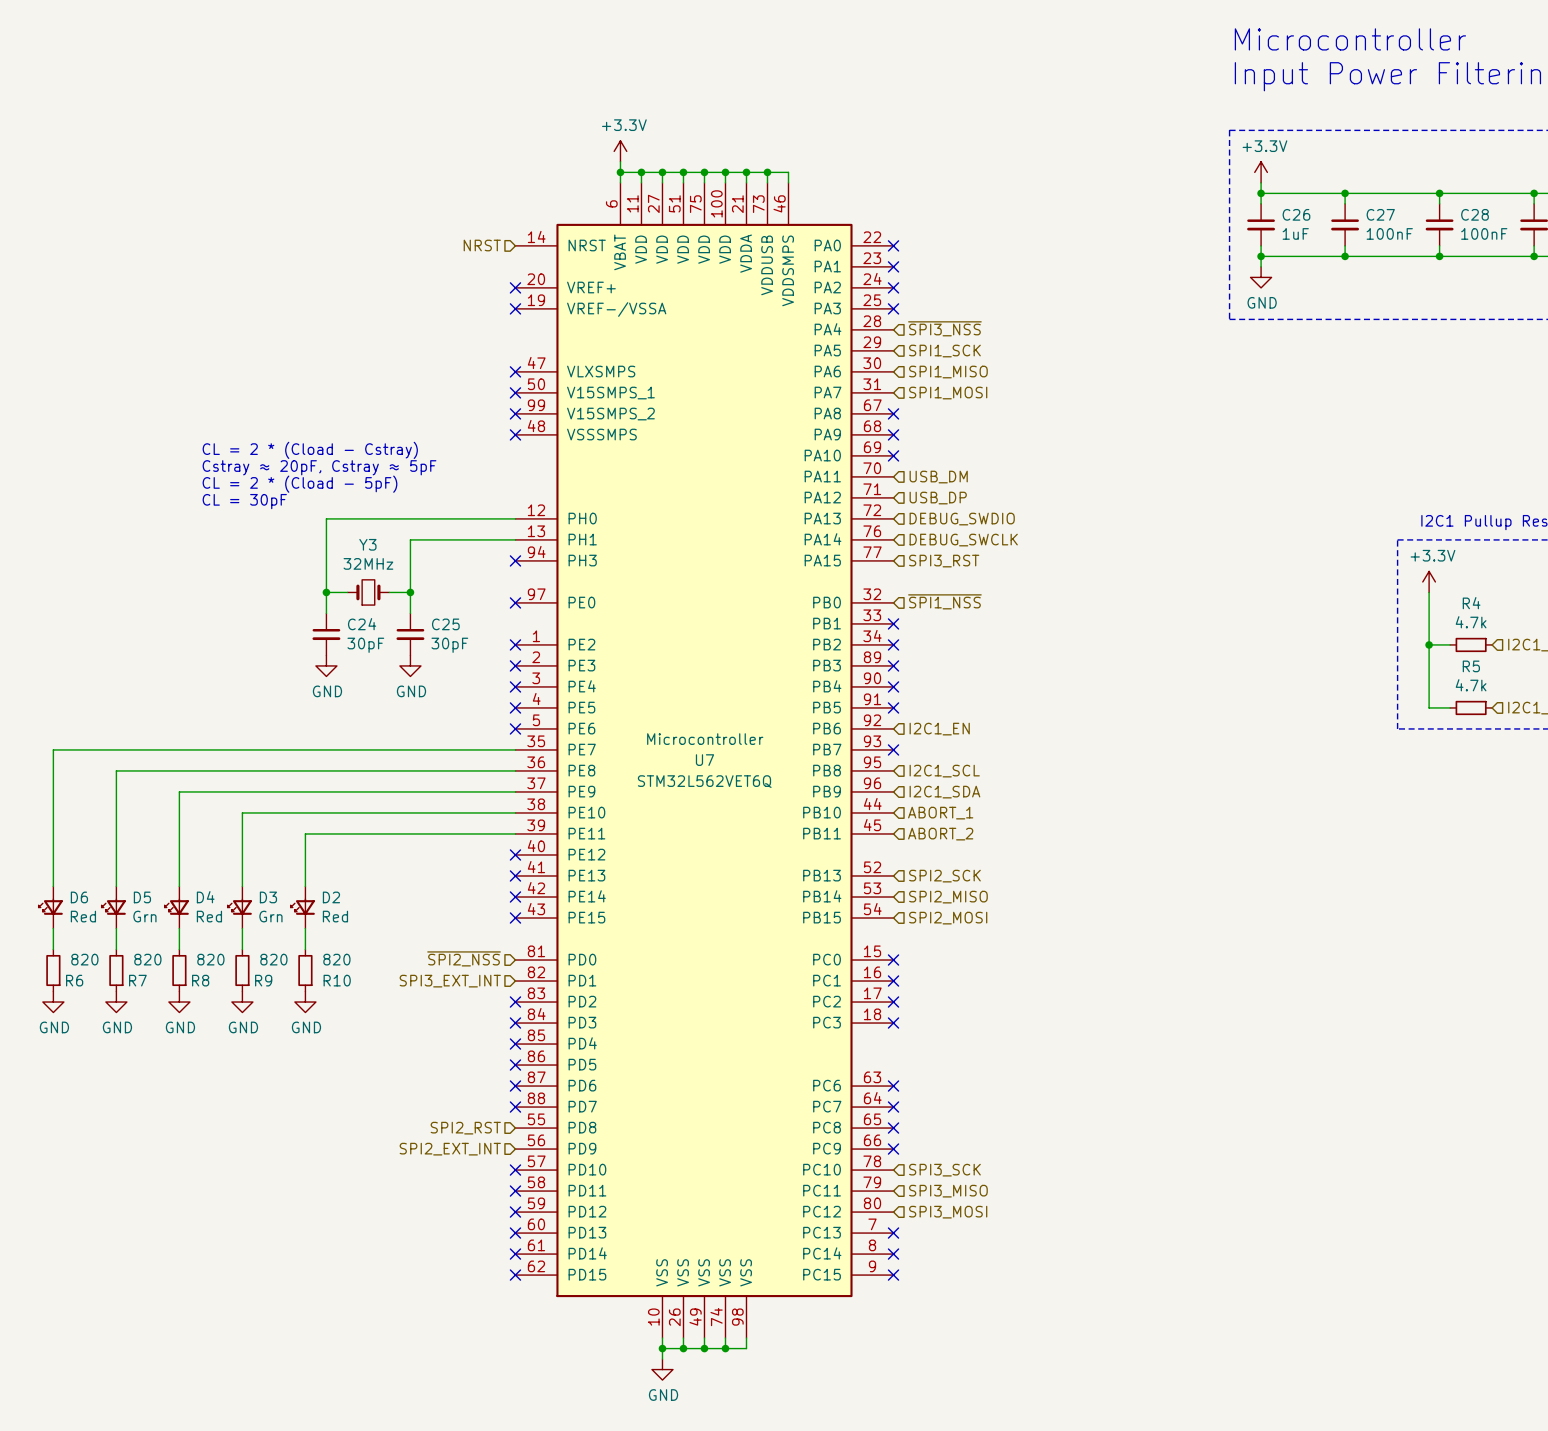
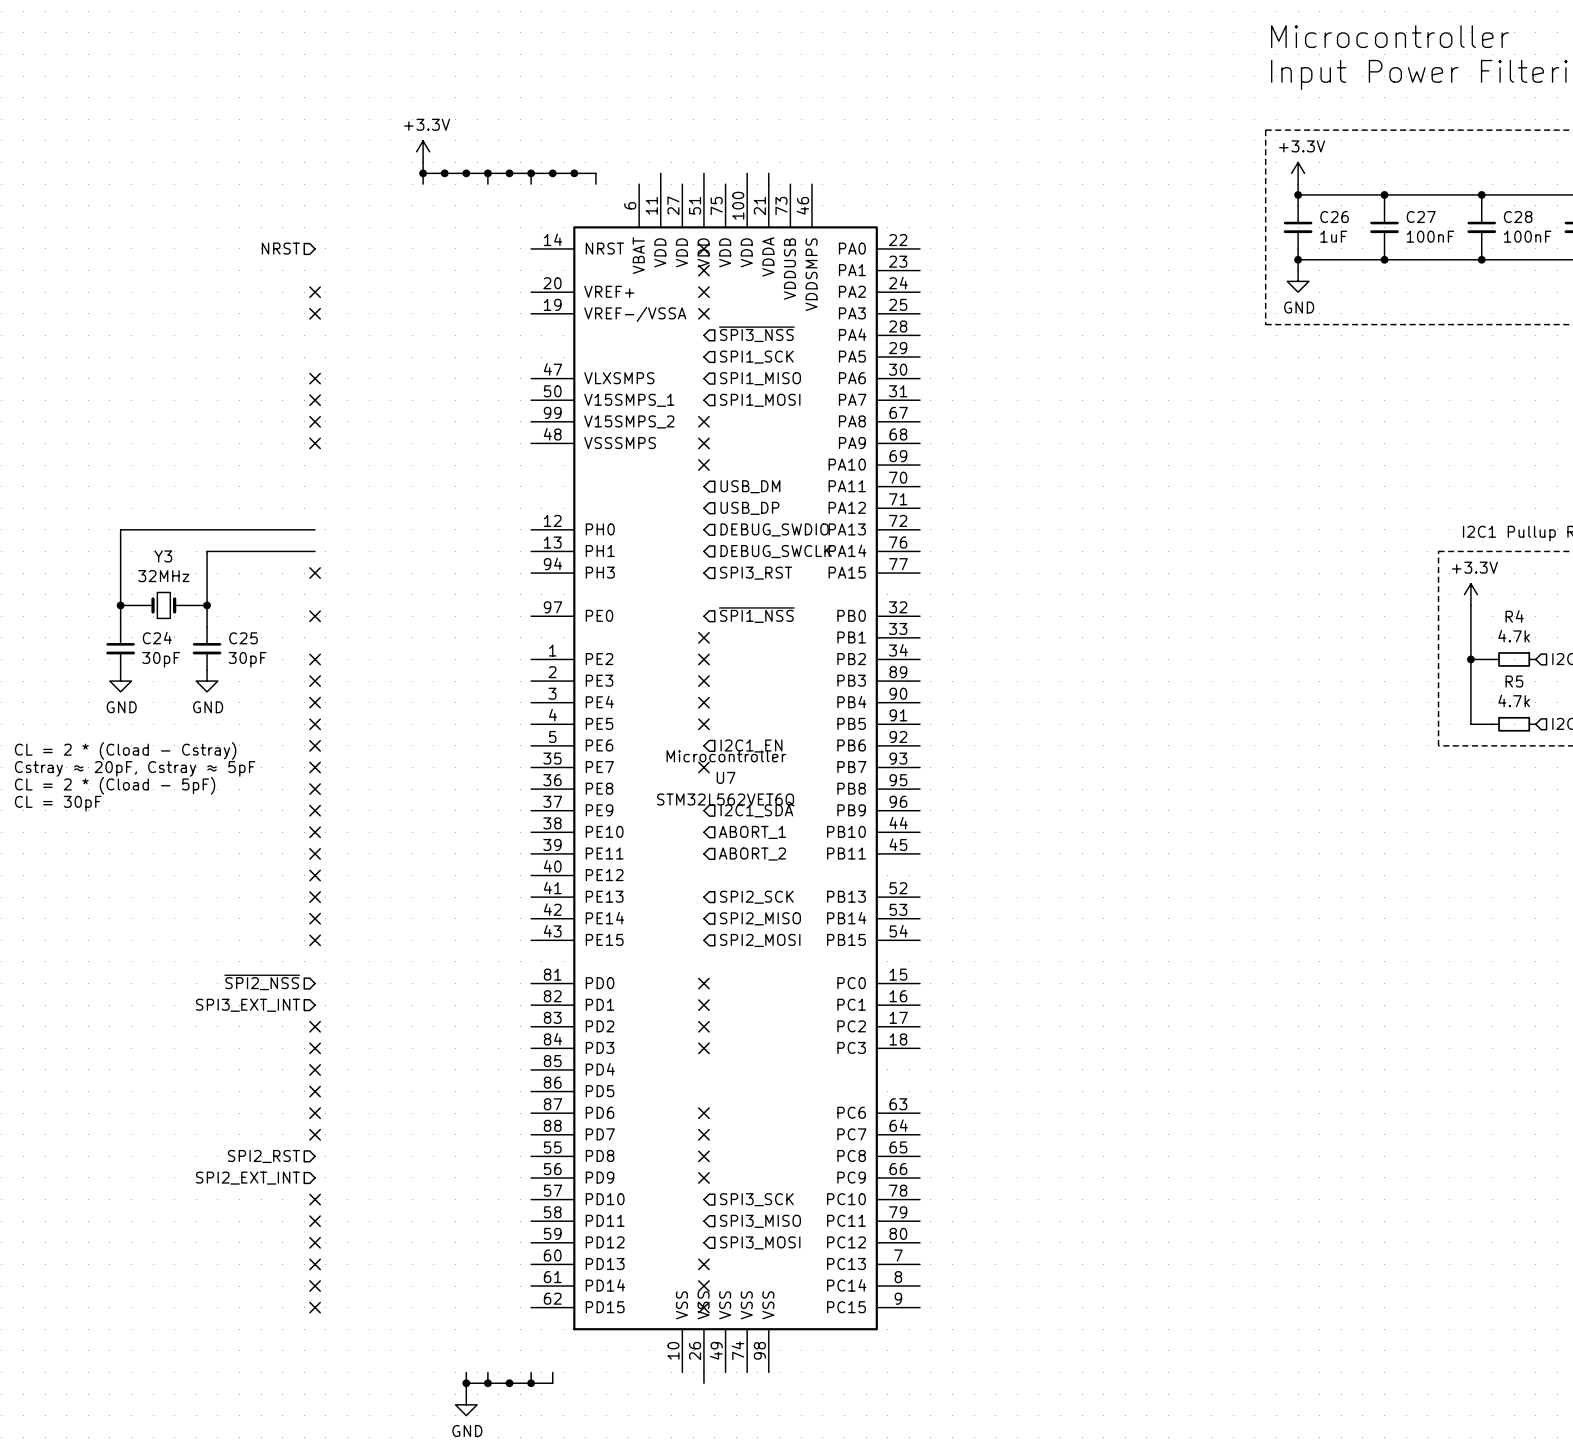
power symbol: none -> +3.3V (423, 151)
power symbol: +3.3V (620, 151) -> none
wire: none -> (423, 162) (423, 184)
wire: (620, 161) (620, 182) -> none
wire: none -> (423, 173) (595, 173) (595, 184)
junction: none -> (423, 173)
junction: none -> (444, 173)
junction: none -> (466, 173)
junction: none -> (487, 173)
junction: none -> (509, 173)
junction: none -> (531, 173)
junction: none -> (552, 173)
junction: none -> (574, 173)
wire: (620, 172) (788, 172) (788, 182) -> none
junction: (620, 172) -> none
junction: (641, 172) -> none
wire: (662, 172) (662, 182) -> (487, 173) (487, 184)
junction: (662, 172) -> none
junction: (683, 172) -> none
wire: (704, 172) (704, 182) -> (531, 173) (531, 184)
junction: (704, 172) -> none
junction: (725, 172) -> none
junction: (746, 172) -> none
wire: (767, 172) (767, 182) -> none
junction: (767, 172) -> none
hierarchical label: none -> NRST (280, 248)
hierarchical label: NRST (482, 245) -> none
no-connect mark: none -> (703, 248)
no-connect mark: (893, 245) -> none
no-connect mark: none -> (703, 270)
no-connect mark: (893, 266) -> none
no-connect mark: none -> (315, 292)
no-connect mark: (515, 287) -> none
no-connect mark: none -> (703, 292)
no-connect mark: (893, 287) -> none
no-connect mark: none -> (315, 313)
no-connect mark: (515, 308) -> none
no-connect mark: none -> (703, 313)
no-connect mark: (893, 308) -> none
hierarchical label: none -> ~{SPI3_NSS} (756, 334)
hierarchical label: ~{SPI3_NSS} (944, 328) -> none
hierarchical label: none -> SPI1_SCK (756, 357)
hierarchical label: SPI1_SCK (944, 351) -> none
no-connect mark: none -> (315, 378)
no-connect mark: (515, 371) -> none
hierarchical label: none -> SPI1_MISO (760, 378)
hierarchical label: SPI1_MISO (948, 372) -> none
no-connect mark: none -> (315, 400)
no-connect mark: (515, 392) -> none
hierarchical label: none -> SPI1_MOSI (760, 400)
hierarchical label: SPI1_MOSI (948, 393) -> none
no-connect mark: none -> (315, 421)
no-connect mark: (515, 413) -> none
no-connect mark: none -> (703, 421)
no-connect mark: (893, 413) -> none
no-connect mark: none -> (315, 443)
no-connect mark: (515, 434) -> none
no-connect mark: none -> (703, 443)
no-connect mark: (893, 434) -> none
text: CL = 2 * (Cload - Cstray) (310, 450) -> none
no-connect mark: none -> (703, 465)
no-connect mark: (893, 455) -> none
text: Cstray ≈ 20pF, Cstray ≈ 5pF (319, 467) -> none
hierarchical label: none -> USB_DM (750, 486)
hierarchical label: USB_DM (938, 477) -> none
text: CL = 2 * (Cload - 5pF) (299, 484) -> none
hierarchical label: none -> USB_DP (749, 508)
hierarchical label: USB_DP (938, 498) -> none
text: CL = 30pF (244, 501) -> none
wire: none -> (315, 529) (120, 529) (120, 627)
wire: (515, 518) (326, 518) (326, 613) -> none
hierarchical label: none -> DEBUG_SWDIO (774, 529)
hierarchical label: DEBUG_SWDIO (962, 519) -> none
wire: none -> (315, 551) (207, 551) (207, 627)
wire: (515, 539) (410, 539) (410, 613) -> none
hierarchical label: none -> DEBUG_SWCLK (776, 551)
hierarchical label: DEBUG_SWCLK (963, 540) -> none
no-connect mark: none -> (315, 573)
no-connect mark: (515, 560) -> none
hierarchical label: none -> SPI3_RST (756, 573)
hierarchical label: SPI3_RST (944, 561) -> none
wire: none -> (120, 605) (142, 605)
junction: none -> (120, 605)
junction: none -> (207, 605)
wire: (326, 592) (347, 592) -> (185, 605) (207, 605)
junction: (326, 592) -> none
Y3 position: (368, 592) -> (163, 605)
wire: (389, 592) (410, 592) -> none
junction: (410, 592) -> none
hierarchical label: none -> ~{SPI1_NSS} (756, 615)
hierarchical label: ~{SPI1_NSS} (944, 601) -> none
no-connect mark: none -> (315, 616)
no-connect mark: (515, 602) -> none
no-connect mark: none -> (703, 637)
no-connect mark: (893, 623) -> none
C24 position: (326, 634) -> (120, 648)
C25 position: (410, 634) -> (207, 648)
no-connect mark: none -> (315, 659)
no-connect mark: (515, 644) -> none
no-connect mark: none -> (703, 659)
no-connect mark: (893, 644) -> none
power symbol: none -> GND (120, 681)
power symbol: none -> GND (207, 681)
no-connect mark: none -> (315, 681)
power symbol: GND (326, 665) -> none
power symbol: GND (410, 665) -> none
no-connect mark: (515, 665) -> none
no-connect mark: none -> (703, 681)
no-connect mark: (893, 665) -> none
no-connect mark: none -> (315, 702)
no-connect mark: (515, 686) -> none
no-connect mark: none -> (703, 702)
no-connect mark: (893, 686) -> none
no-connect mark: none -> (315, 724)
no-connect mark: (515, 707) -> none
no-connect mark: none -> (703, 724)
no-connect mark: (893, 707) -> none
no-connect mark: none -> (315, 745)
no-connect mark: (515, 728) -> none
hierarchical label: none -> I2C1_EN (751, 745)
hierarchical label: I2C1_EN (939, 729) -> none
text: none -> CL = 2 * (Cload - Cstray) (125, 750)
no-connect mark: none -> (315, 767)
wire: (515, 749) (53, 749) (53, 886) -> none
no-connect mark: none -> (703, 767)
no-connect mark: (893, 749) -> none
text: none -> Cstray ≈ 20pF, Cstray ≈ 5pF (135, 768)
text: none -> CL = 2 * (Cload - 5pF) (115, 785)
no-connect mark: none -> (315, 789)
wire: (515, 770) (116, 770) (116, 886) -> none
hierarchical label: I2C1_SCL (944, 771) -> none
text: none -> CL = 30pF (58, 803)
no-connect mark: none -> (315, 810)
wire: (515, 791) (179, 791) (179, 886) -> none
hierarchical label: none -> I2C1_SDA (756, 810)
hierarchical label: I2C1_SDA (944, 792) -> none
no-connect mark: none -> (315, 832)
wire: (515, 812) (242, 812) (242, 886) -> none
hierarchical label: none -> ABORT_1 (752, 832)
hierarchical label: ABORT_1 (940, 813) -> none
no-connect mark: none -> (315, 853)
wire: (515, 833) (305, 833) (305, 886) -> none
hierarchical label: none -> ABORT_2 (752, 854)
hierarchical label: ABORT_2 (940, 834) -> none
no-connect mark: none -> (315, 875)
no-connect mark: (515, 854) -> none
no-connect mark: none -> (315, 897)
no-connect mark: (515, 875) -> none
hierarchical label: none -> SPI2_SCK (756, 897)
hierarchical label: SPI2_SCK (944, 876) -> none
no-connect mark: none -> (315, 918)
no-connect mark: (515, 897) -> none
hierarchical label: none -> SPI2_MISO (760, 918)
hierarchical label: SPI2_MISO (948, 897) -> none
D6: Red (50, 907) -> none
D5: Grn (113, 907) -> none
D4: Red (176, 907) -> none
D3: Grn (239, 907) -> none
D2: Red (302, 907) -> none
no-connect mark: none -> (315, 940)
no-connect mark: (515, 918) -> none
hierarchical label: none -> SPI2_MOSI (760, 940)
hierarchical label: SPI2_MOSI (948, 918) -> none
wire: (53, 928) (53, 949) -> none
wire: (116, 928) (116, 949) -> none
wire: (179, 928) (179, 949) -> none
wire: (242, 928) (242, 949) -> none
wire: (305, 928) (305, 949) -> none
hierarchical label: none -> ~{SPI2_NSS} (262, 982)
hierarchical label: ~{SPI2_NSS} (464, 958) -> none
no-connect mark: none -> (703, 983)
no-connect mark: (893, 960) -> none
R6: 820 (53, 970) -> none
R7: 820 (116, 970) -> none
R8: 820 (179, 970) -> none
R9: 820 (242, 970) -> none
R10: 820 (305, 970) -> none
hierarchical label: none -> SPI3_EXT_INT (248, 1005)
hierarchical label: SPI3_EXT_INT (450, 981) -> none
no-connect mark: none -> (703, 1005)
no-connect mark: (893, 981) -> none
power symbol: GND (53, 1002) -> none
power symbol: GND (116, 1002) -> none
power symbol: GND (179, 1002) -> none
power symbol: GND (242, 1002) -> none
power symbol: GND (305, 1002) -> none
no-connect mark: none -> (315, 1026)
no-connect mark: (515, 1002) -> none
no-connect mark: none -> (703, 1026)
no-connect mark: (893, 1002) -> none
no-connect mark: none -> (315, 1048)
no-connect mark: (515, 1023) -> none
no-connect mark: none -> (703, 1048)
no-connect mark: (893, 1023) -> none
no-connect mark: none -> (315, 1069)
no-connect mark: (515, 1044) -> none
no-connect mark: none -> (315, 1091)
no-connect mark: (515, 1065) -> none
no-connect mark: none -> (315, 1113)
no-connect mark: (515, 1086) -> none
no-connect mark: none -> (703, 1113)
no-connect mark: (893, 1086) -> none
no-connect mark: none -> (315, 1134)
no-connect mark: (515, 1107) -> none
no-connect mark: none -> (703, 1134)
no-connect mark: (893, 1107) -> none
hierarchical label: none -> SPI2_RST (263, 1156)
hierarchical label: SPI2_RST (465, 1128) -> none
no-connect mark: none -> (703, 1156)
no-connect mark: (893, 1128) -> none
hierarchical label: none -> SPI2_EXT_INT (248, 1178)
hierarchical label: SPI2_EXT_INT (450, 1149) -> none
no-connect mark: none -> (703, 1177)
no-connect mark: (893, 1149) -> none
no-connect mark: none -> (315, 1199)
no-connect mark: (515, 1170) -> none
hierarchical label: none -> SPI3_SCK (756, 1199)
hierarchical label: SPI3_SCK (944, 1170) -> none
no-connect mark: none -> (315, 1221)
no-connect mark: (515, 1191) -> none
hierarchical label: none -> SPI3_MISO (760, 1221)
hierarchical label: SPI3_MISO (948, 1191) -> none
no-connect mark: none -> (315, 1242)
no-connect mark: (515, 1212) -> none
hierarchical label: none -> SPI3_MOSI (760, 1242)
hierarchical label: SPI3_MOSI (948, 1212) -> none
no-connect mark: none -> (315, 1264)
no-connect mark: (515, 1233) -> none
no-connect mark: none -> (703, 1264)
no-connect mark: (893, 1233) -> none
no-connect mark: none -> (315, 1286)
no-connect mark: (515, 1254) -> none
no-connect mark: none -> (703, 1286)
no-connect mark: (893, 1254) -> none
no-connect mark: none -> (315, 1307)
no-connect mark: (515, 1275) -> none
no-connect mark: none -> (703, 1307)
no-connect mark: (893, 1275) -> none
wire: none -> (466, 1372) (466, 1394)
wire: none -> (487, 1372) (487, 1383)
wire: none -> (552, 1372) (552, 1383) (466, 1383)
wire: (662, 1338) (662, 1359) -> none
wire: (704, 1338) (704, 1348) -> (531, 1372) (531, 1383)
wire: (725, 1338) (725, 1348) -> none
wire: (746, 1338) (746, 1348) (662, 1348) -> none
junction: none -> (466, 1383)
junction: none -> (487, 1383)
junction: none -> (509, 1383)
junction: none -> (531, 1383)
junction: (662, 1348) -> none
junction: (683, 1348) -> none
junction: (704, 1348) -> none
junction: (725, 1348) -> none
power symbol: none -> GND (466, 1404)
power symbol: GND (662, 1369) -> none

